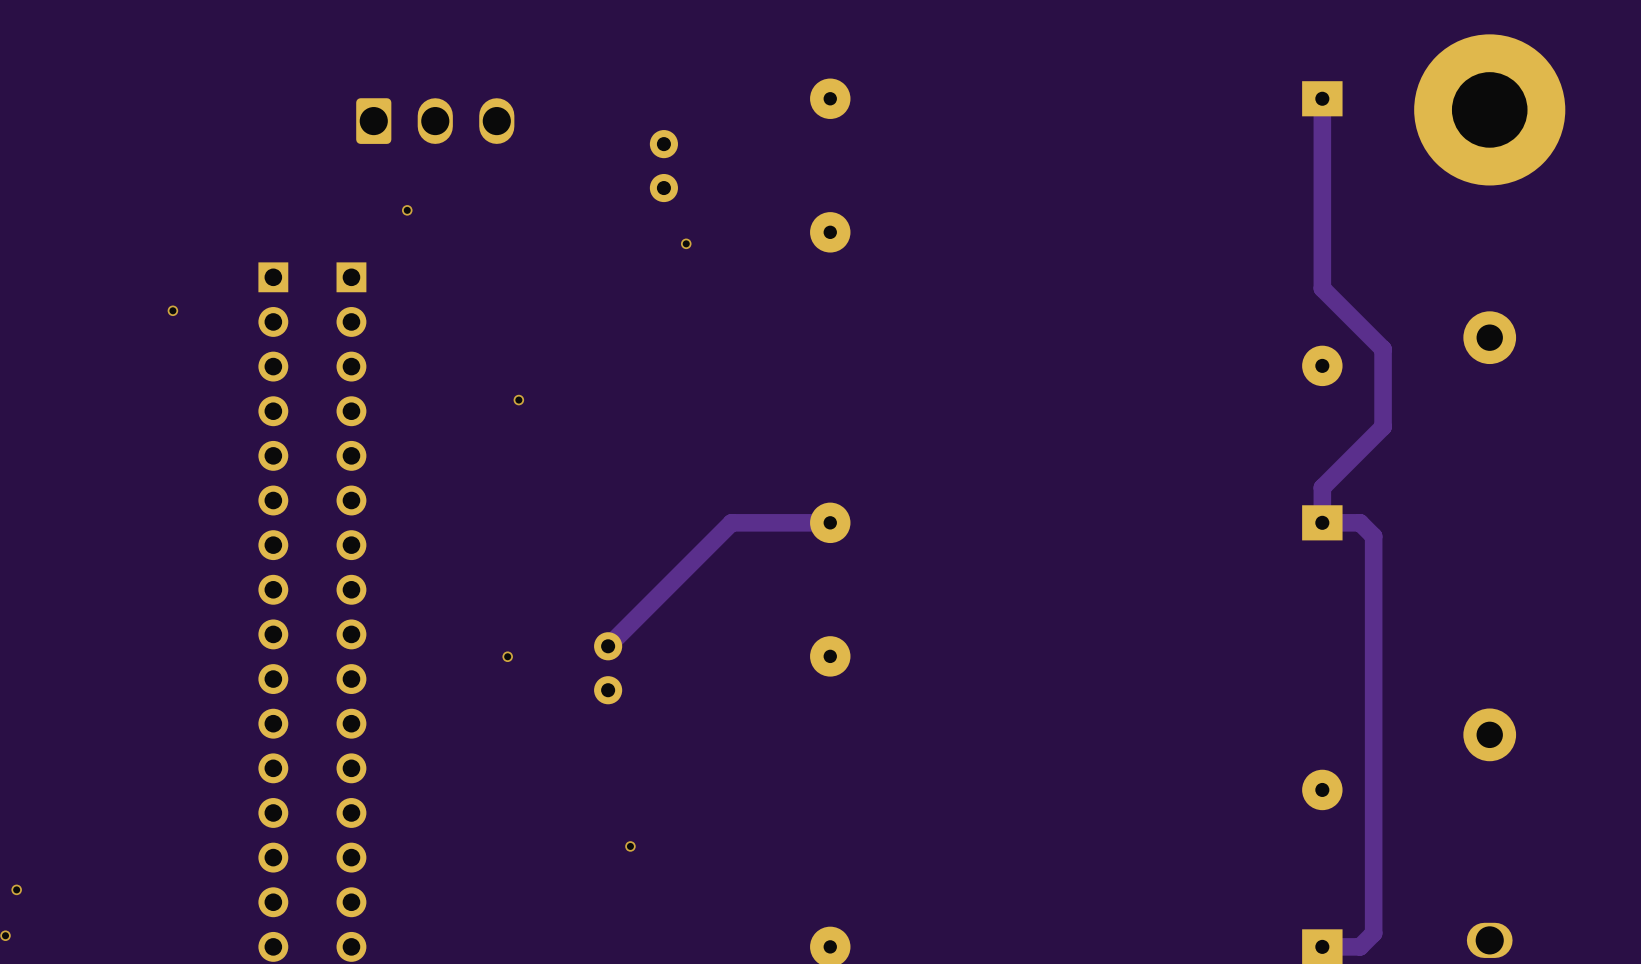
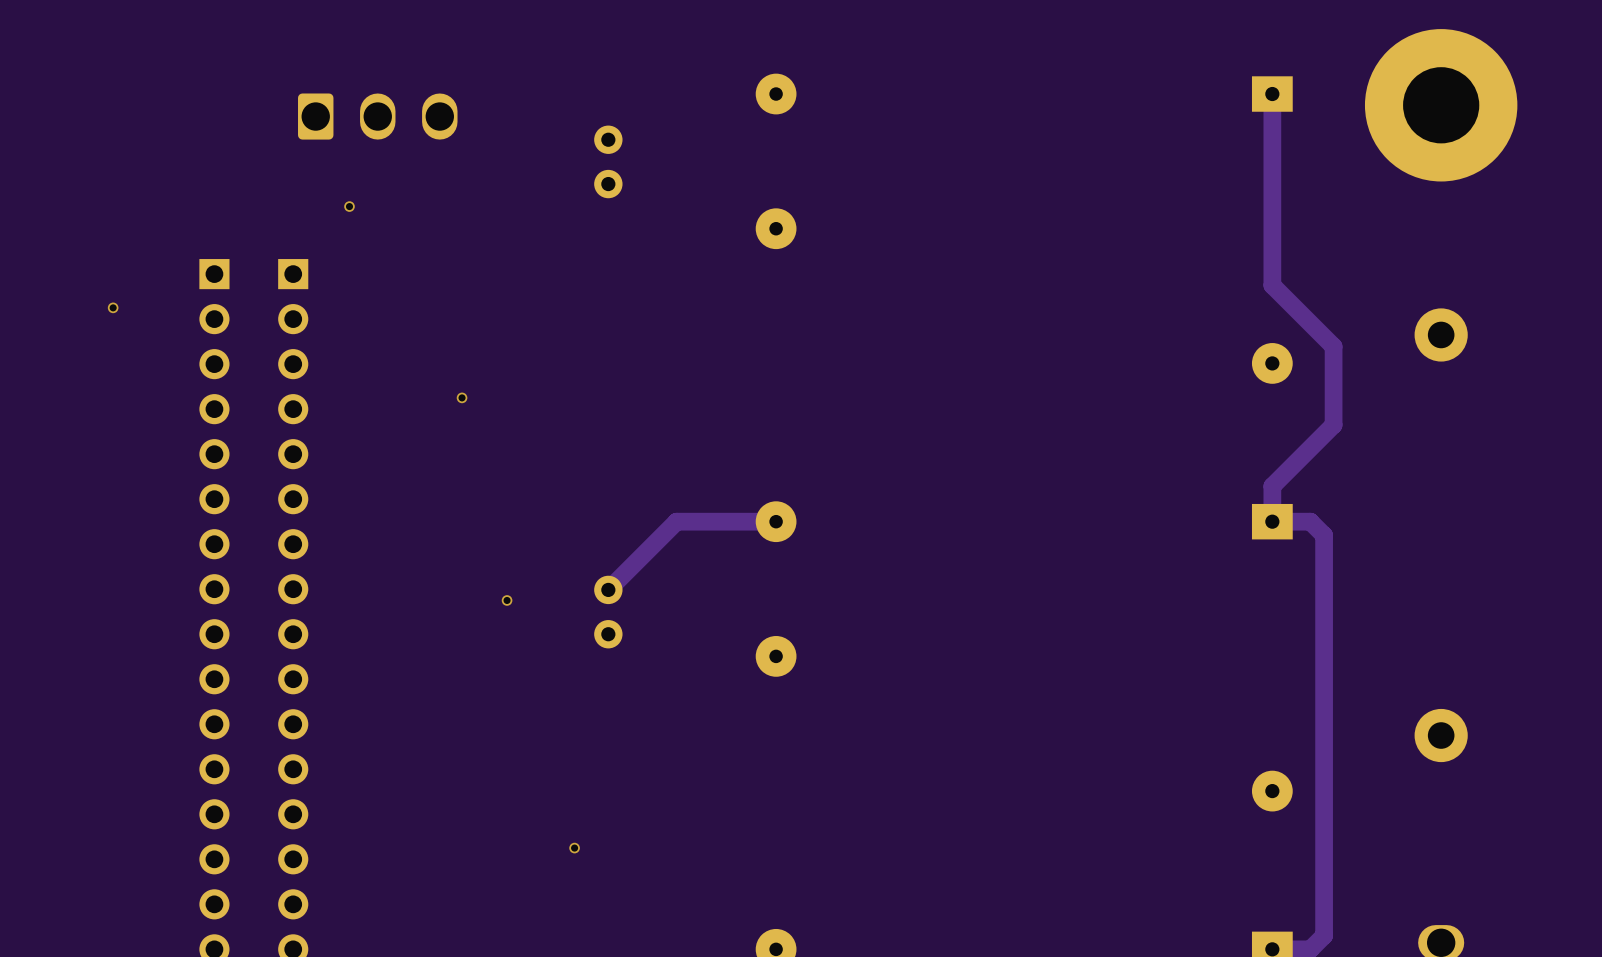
via: (686, 243) -> none
track: (663, 590) (608, 646) -> none
via position: (507, 656) -> (507, 600)
part position: (608, 668) -> (608, 612)

